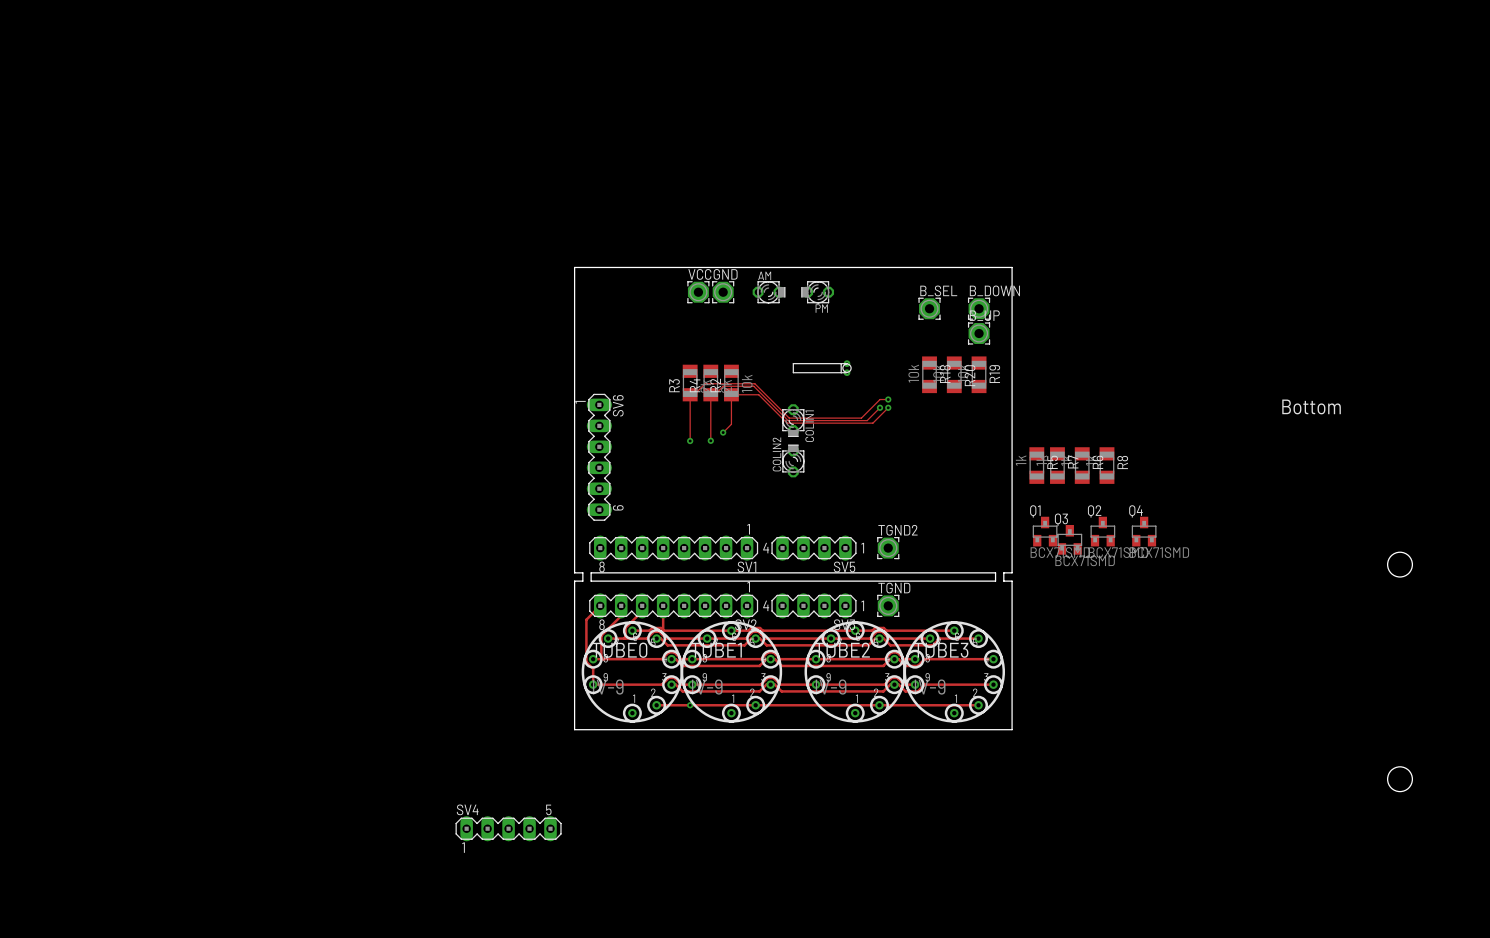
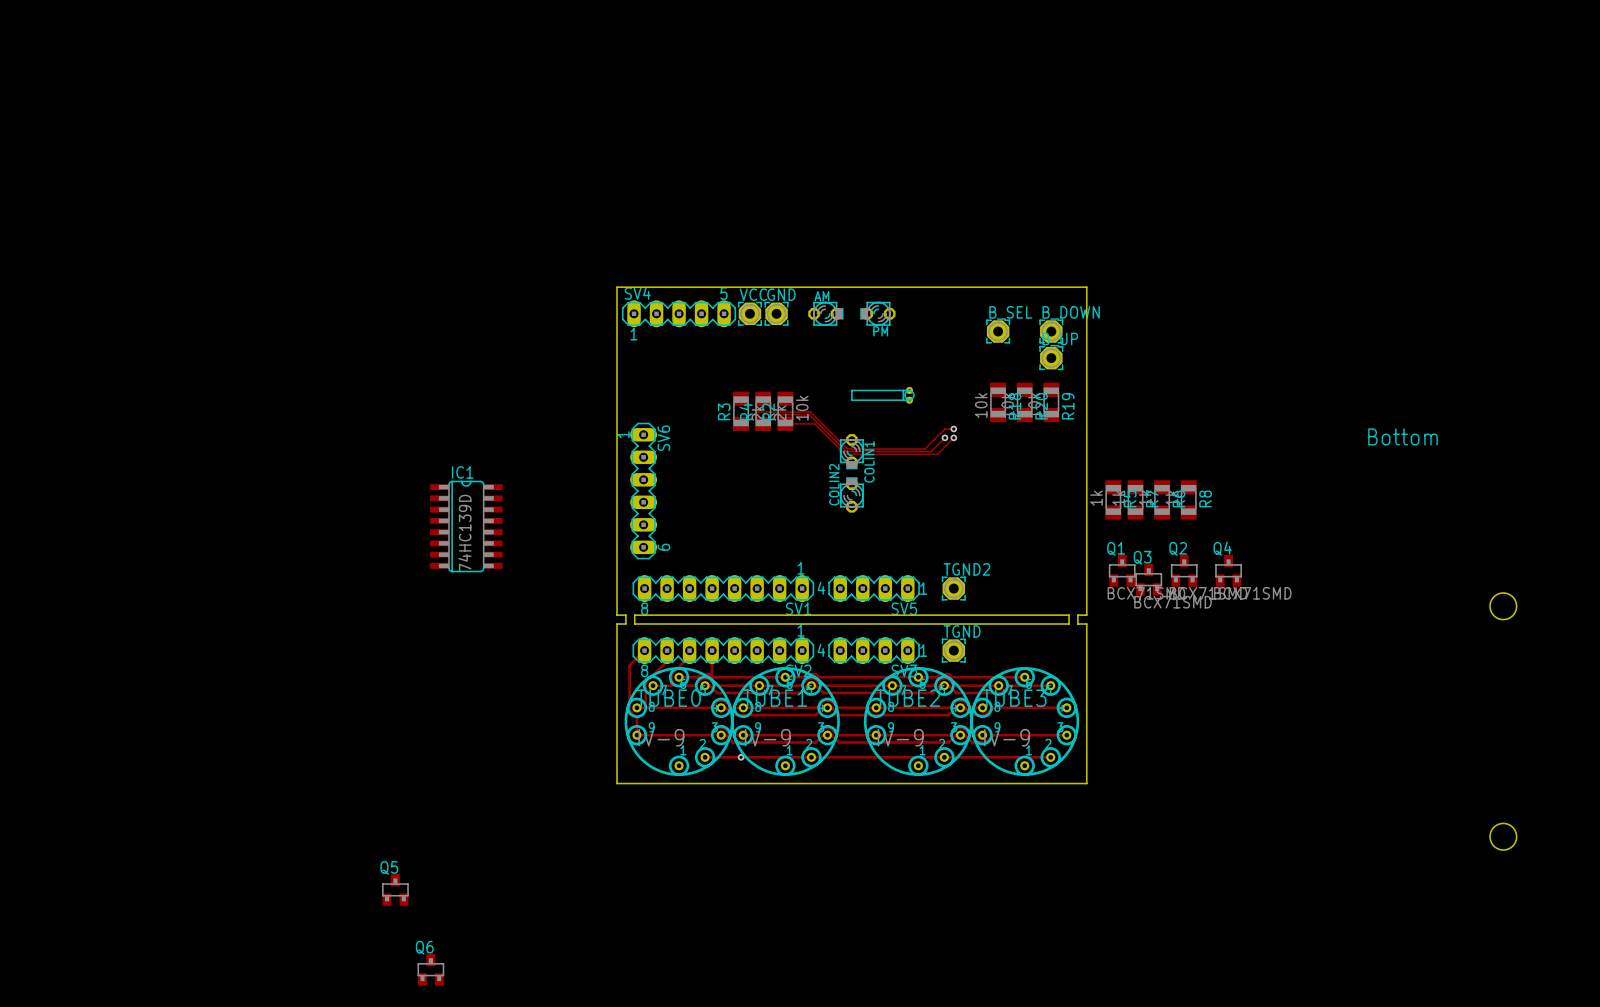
track: (690, 394) (690, 441) -> none
track: (710, 394) (710, 440) -> none
track: (731, 394) (731, 424) (723, 432) -> none
via: (723, 432) -> none
via: (710, 440) -> none
via: (690, 441) -> none
IC1: none -> 74HC139D (466, 526)
Q5: none -> (395, 889)
SV4 position: (508, 828) -> (679, 313)
Q6: none -> (430, 969)

